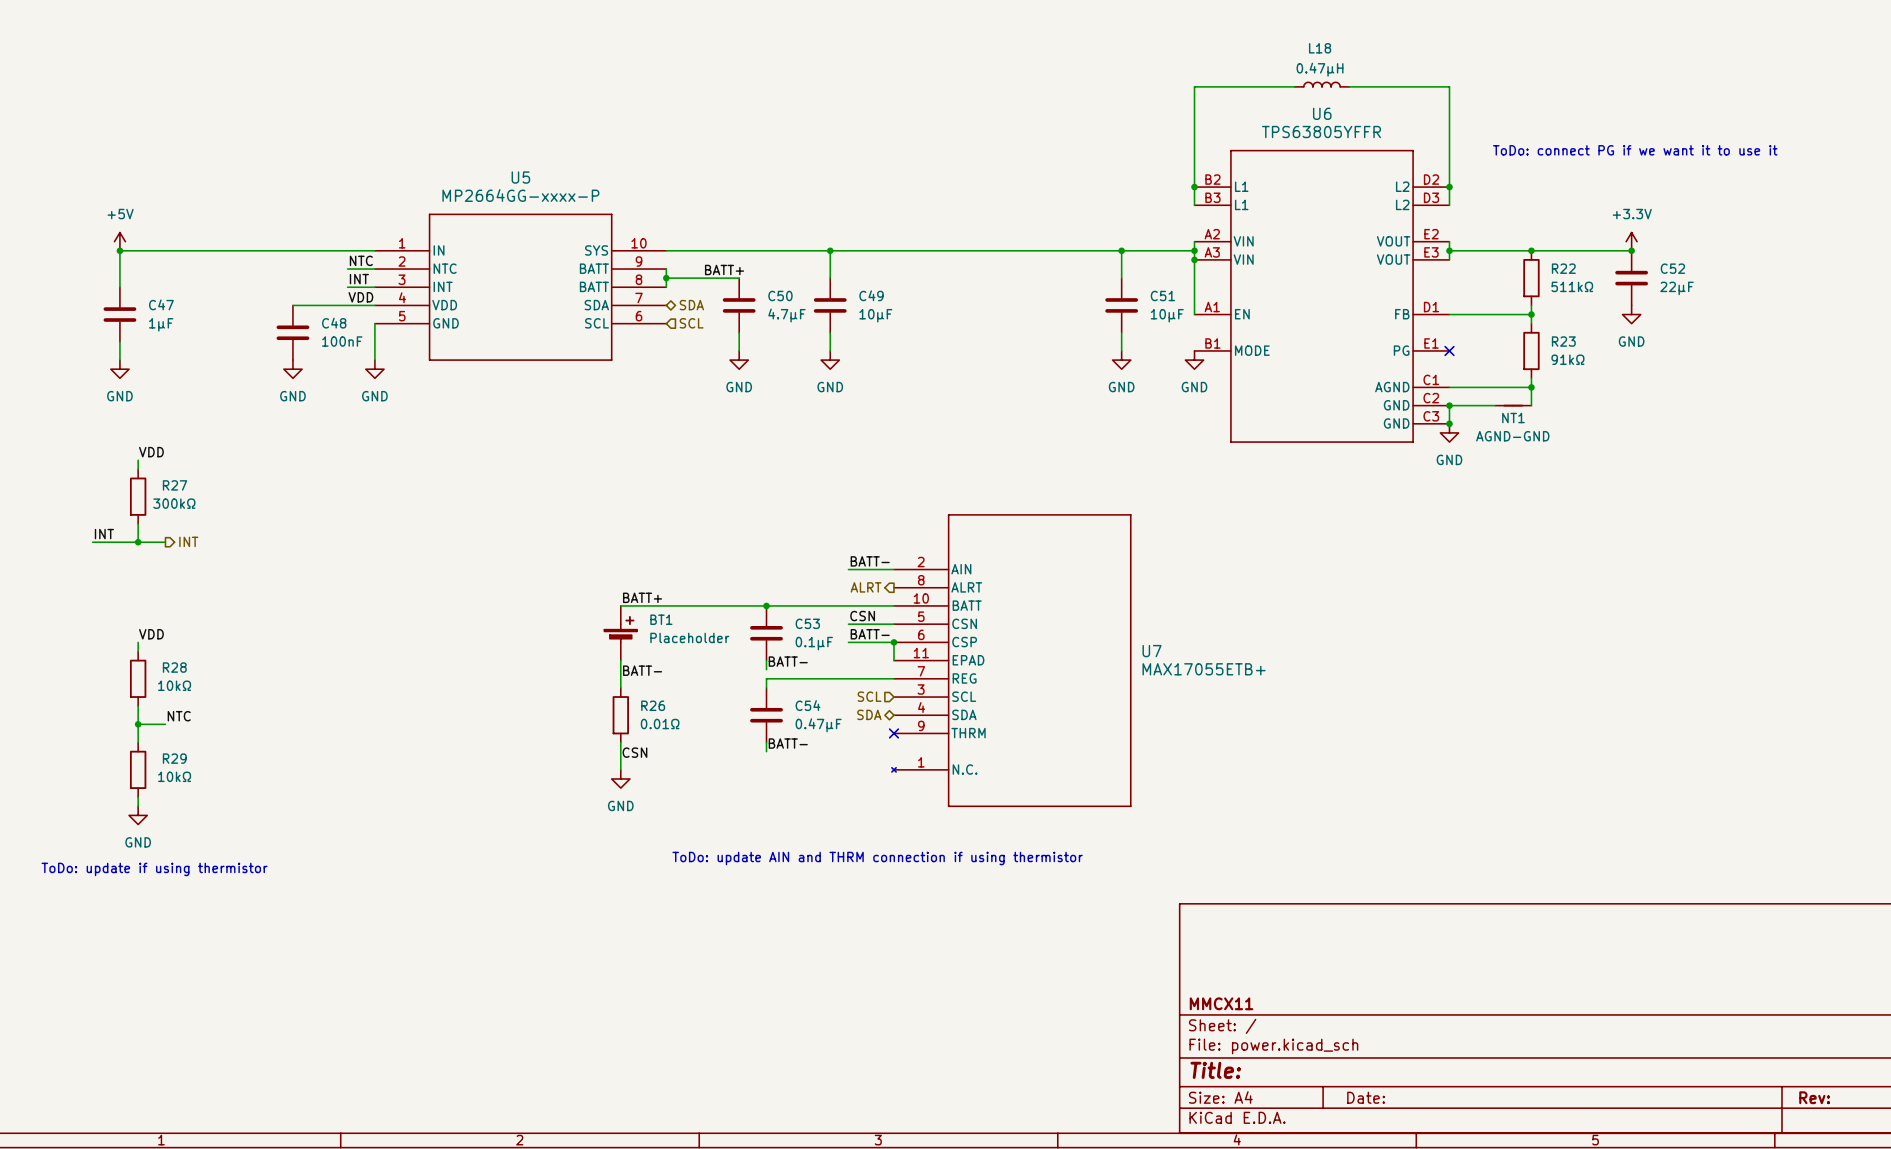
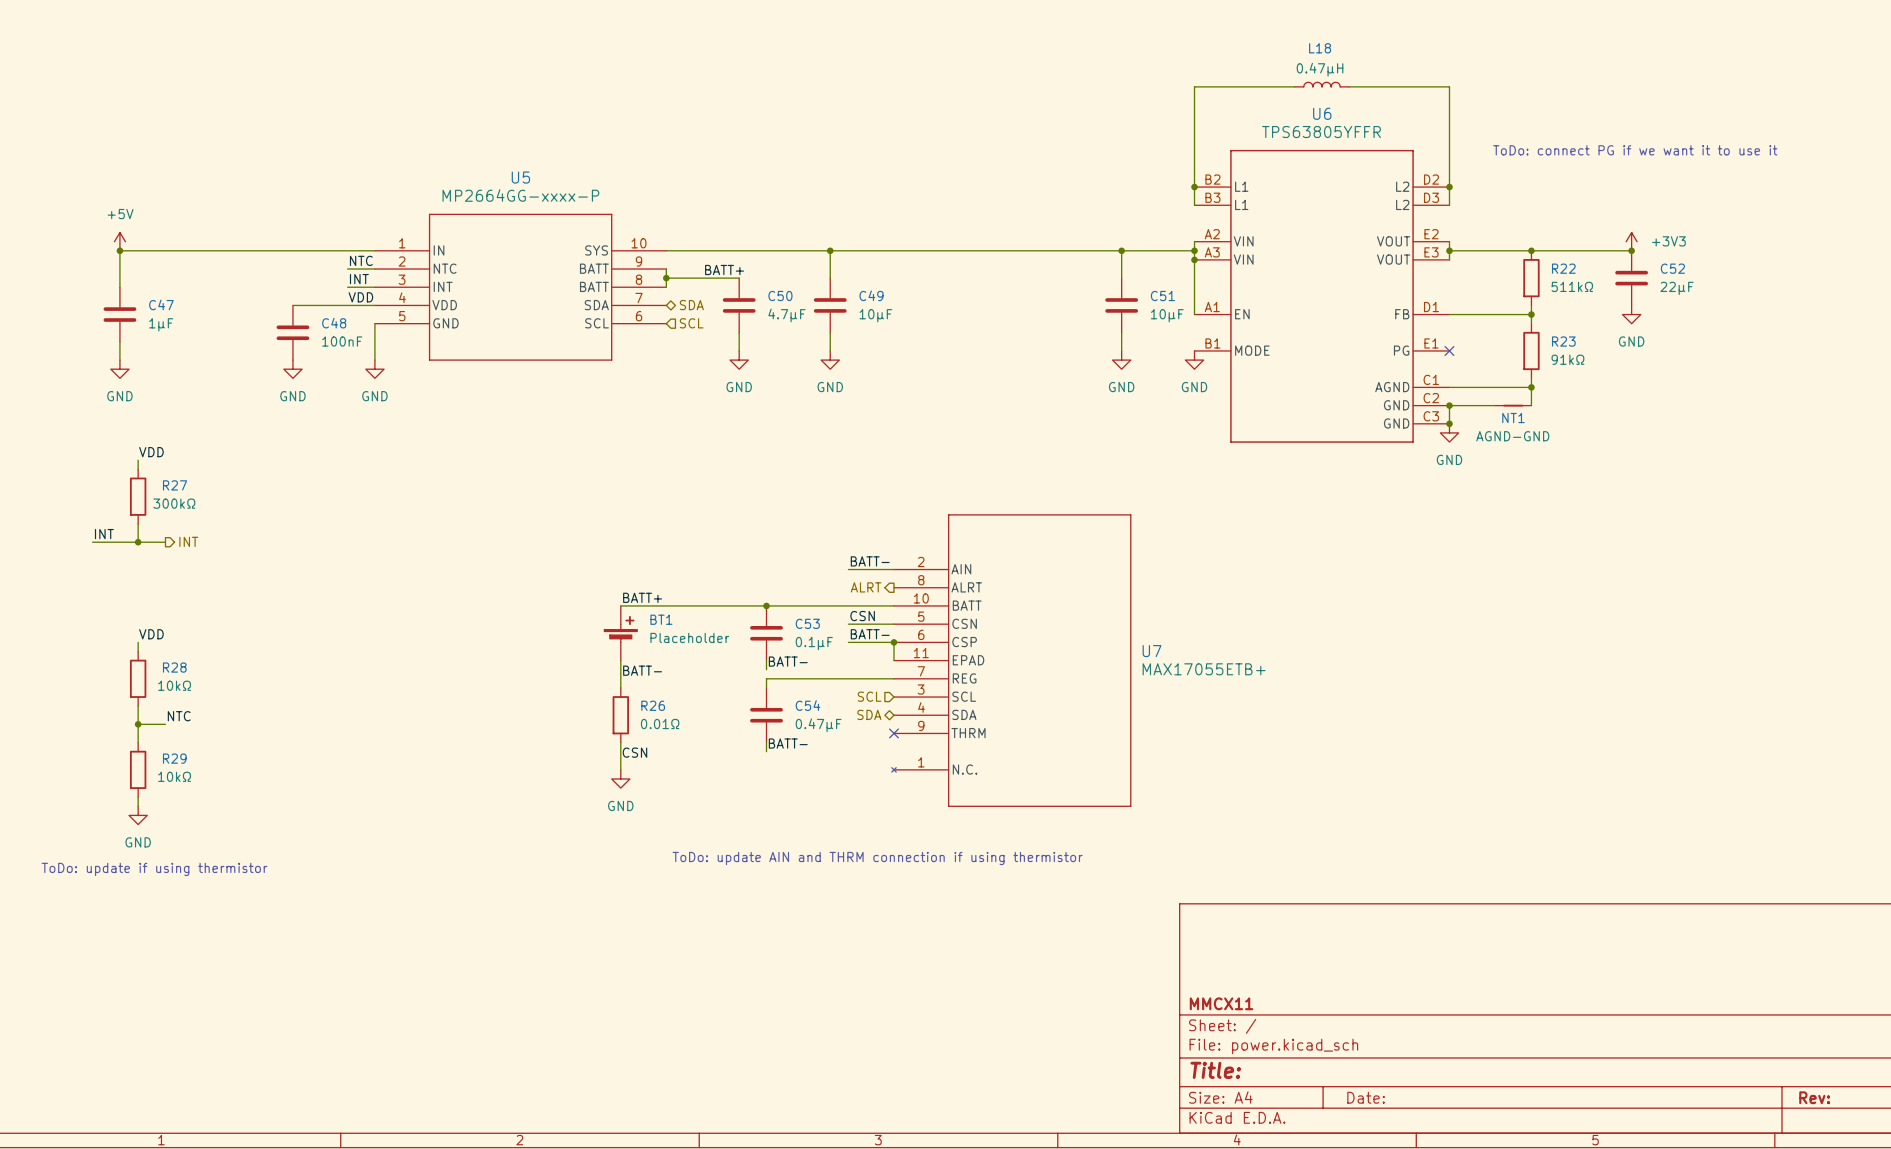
power symbol: +3.3V (1631, 241) -> +3V3 (1631, 241)

